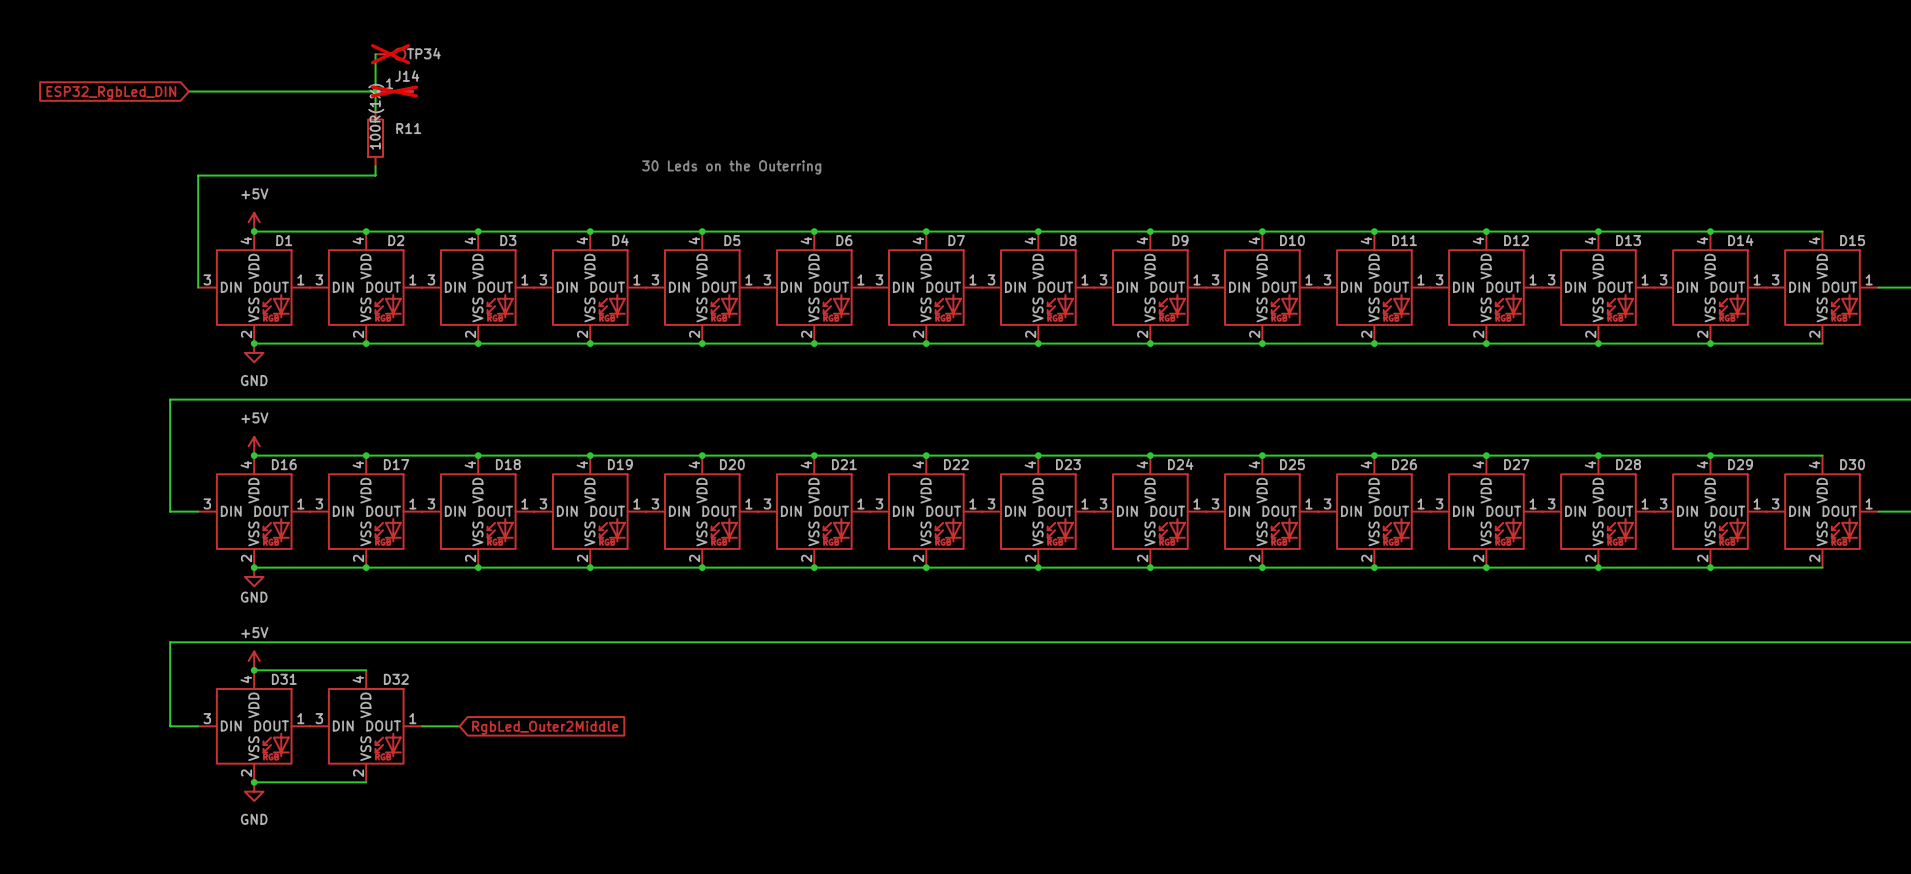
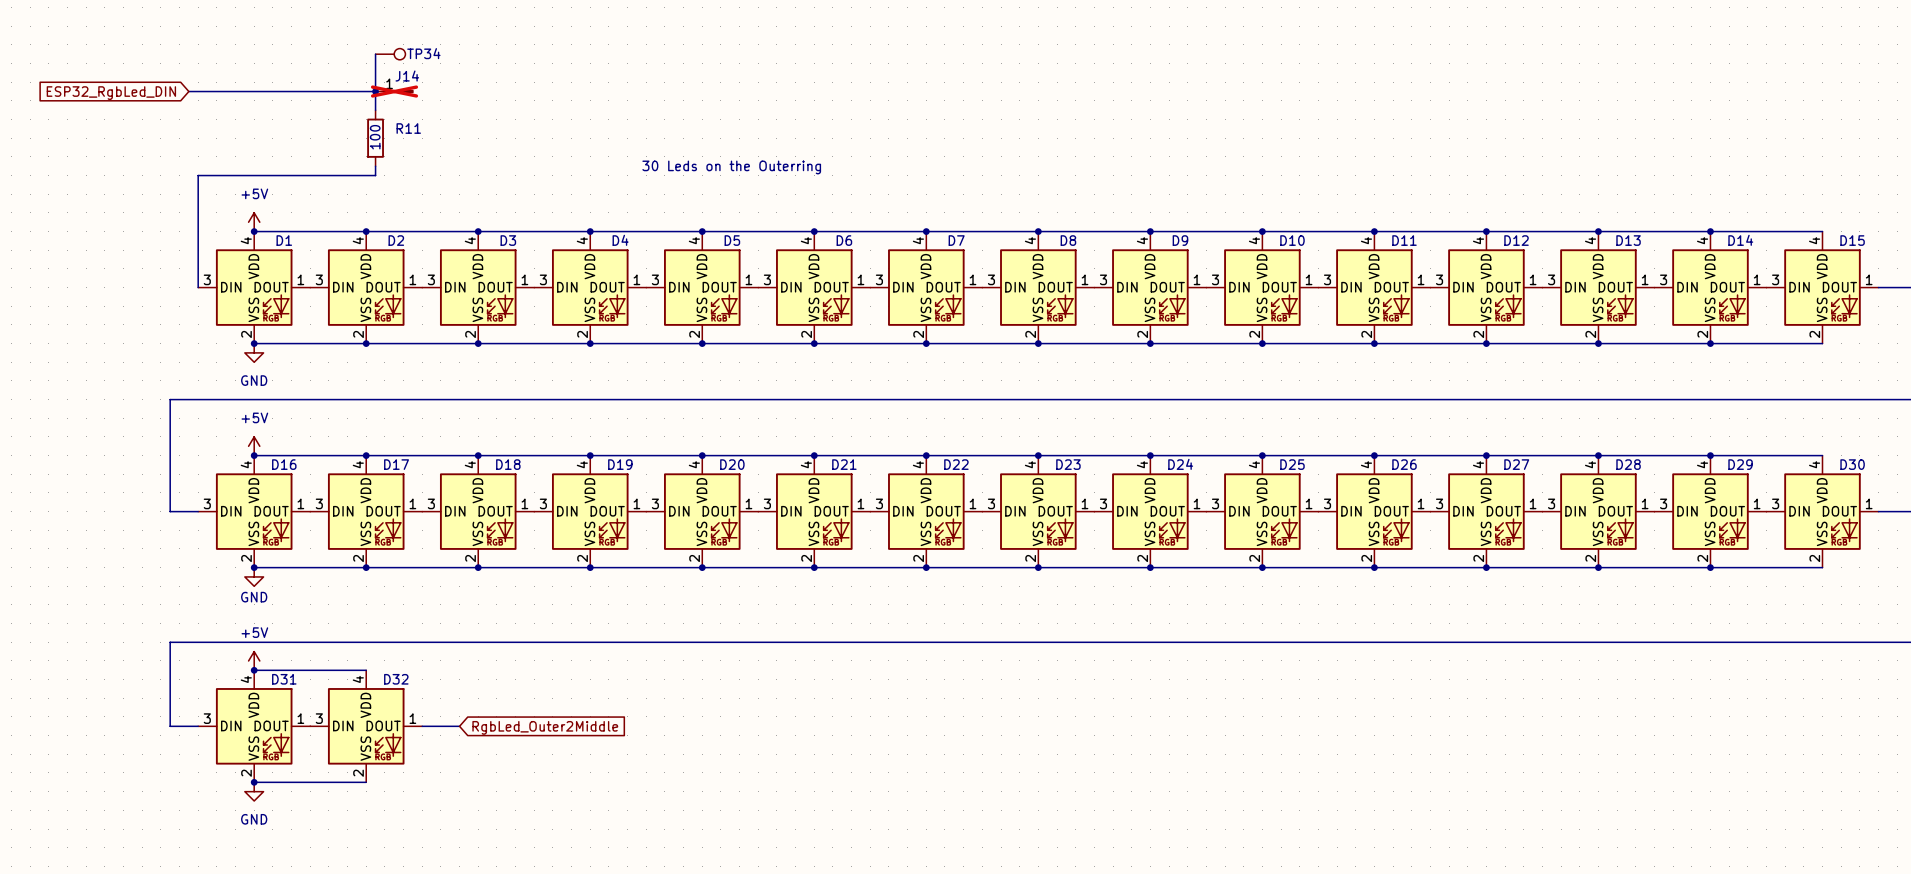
TP34 do-not-place cross: (390, 54) -> none
R11 value: 100R(1%) (376, 116) -> 100 (375, 137)

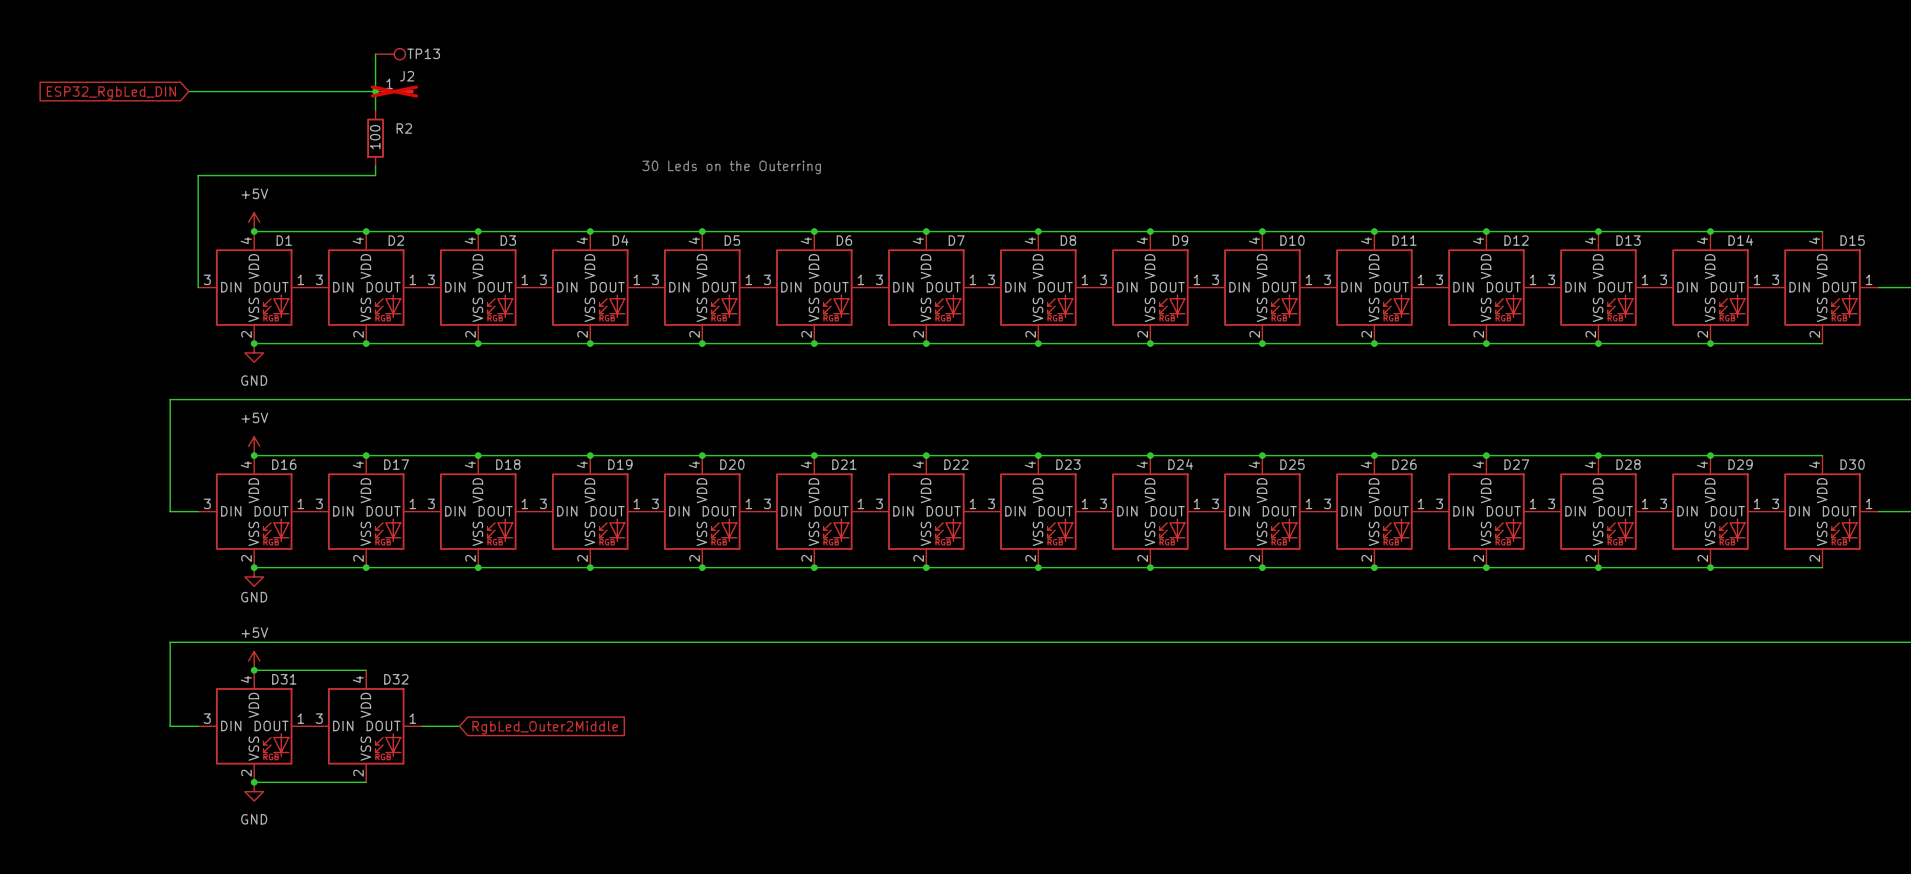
TP34 name: TP34 (423, 53) -> TP13 (423, 53)
J14 name: J14 (407, 76) -> J2 (407, 76)
R11 name: R11 (408, 128) -> R2 (404, 128)

